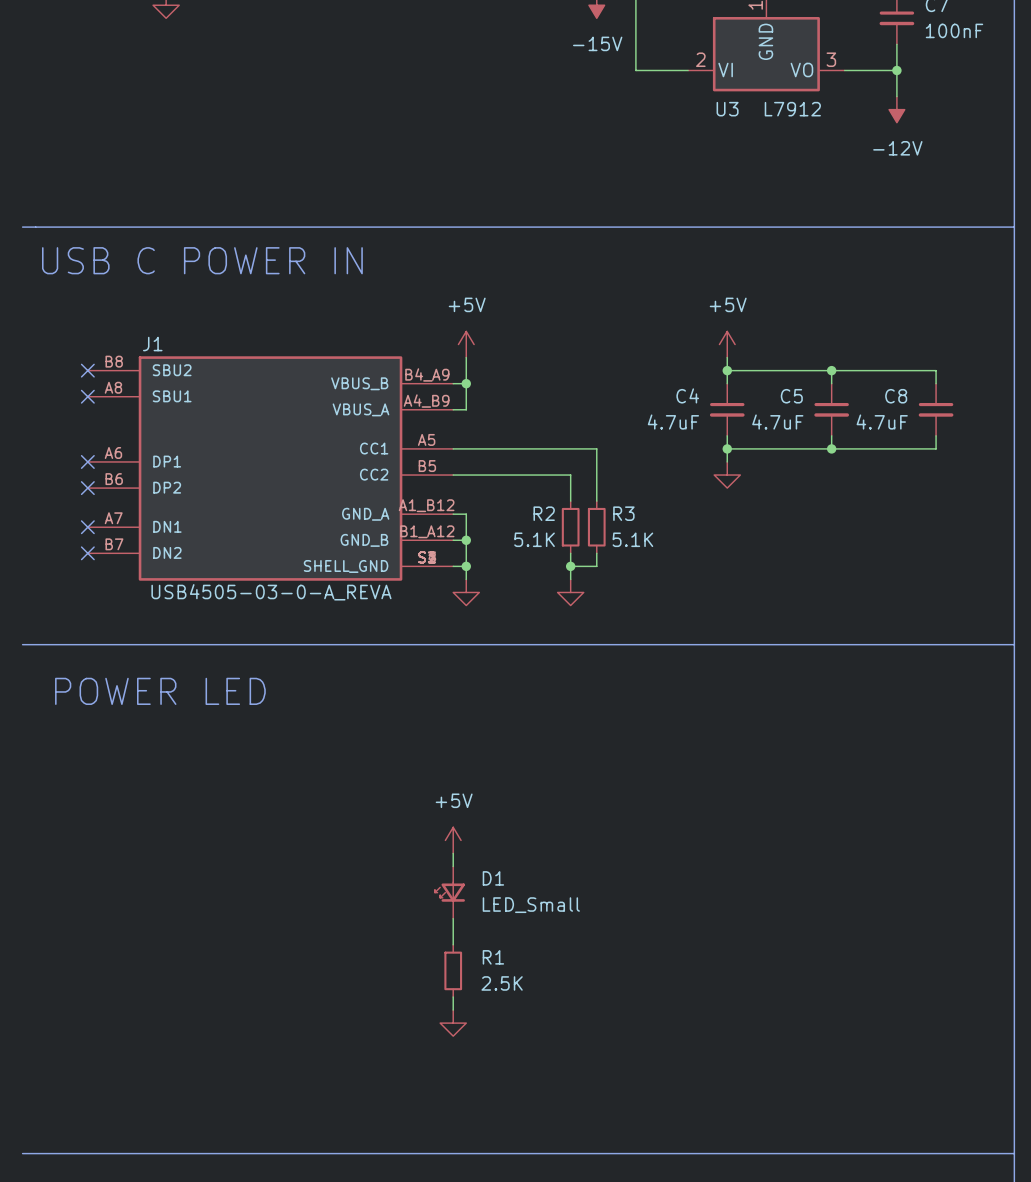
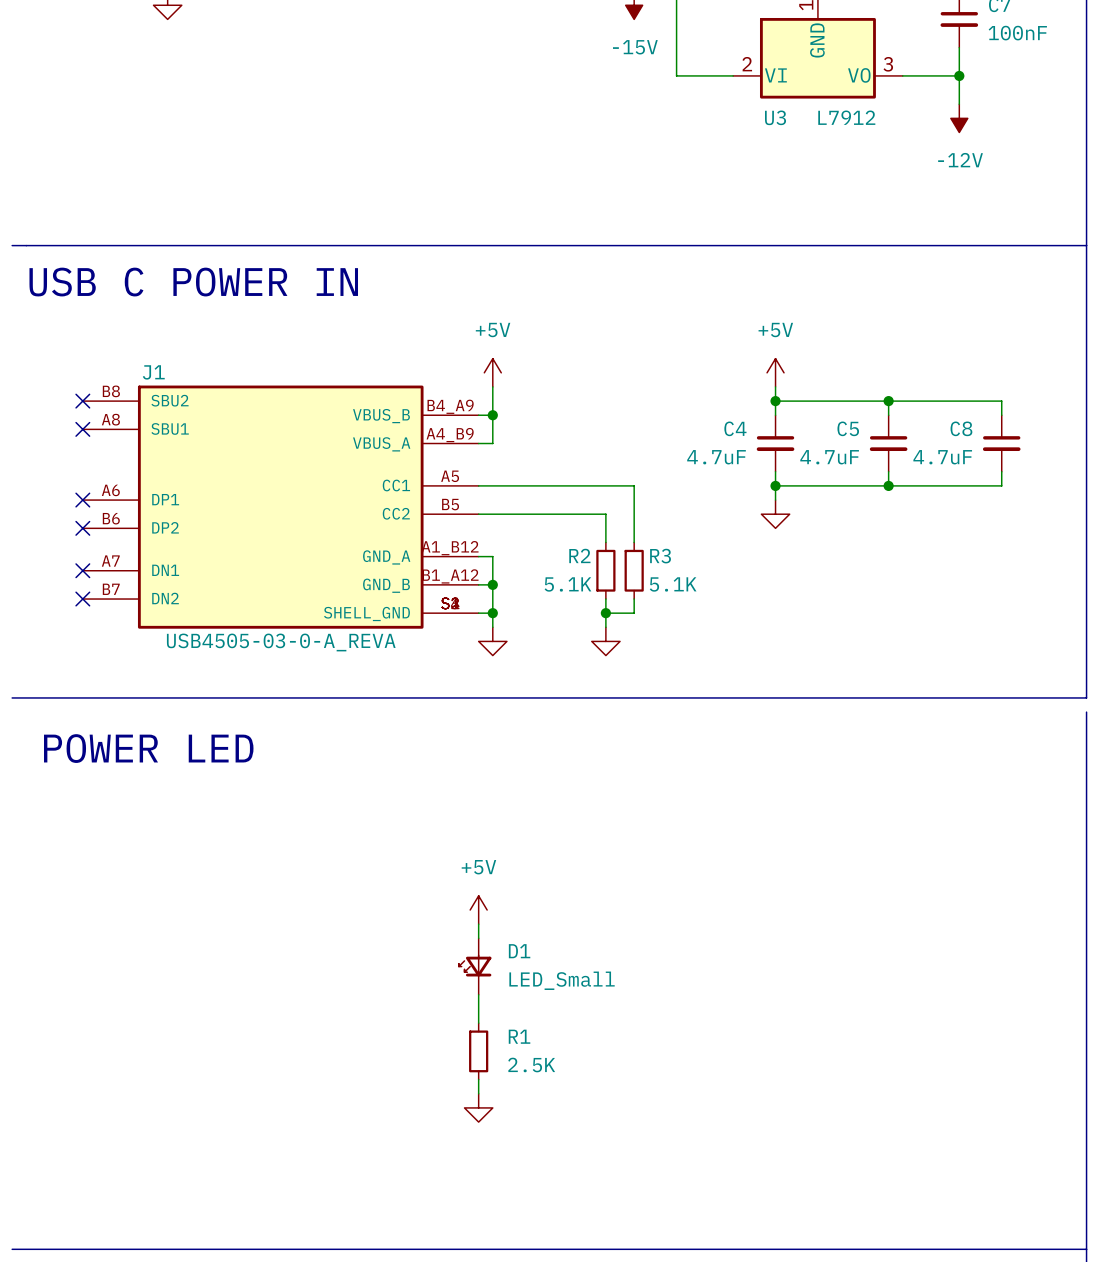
line: (1014, 644) (1014, 657) -> none

